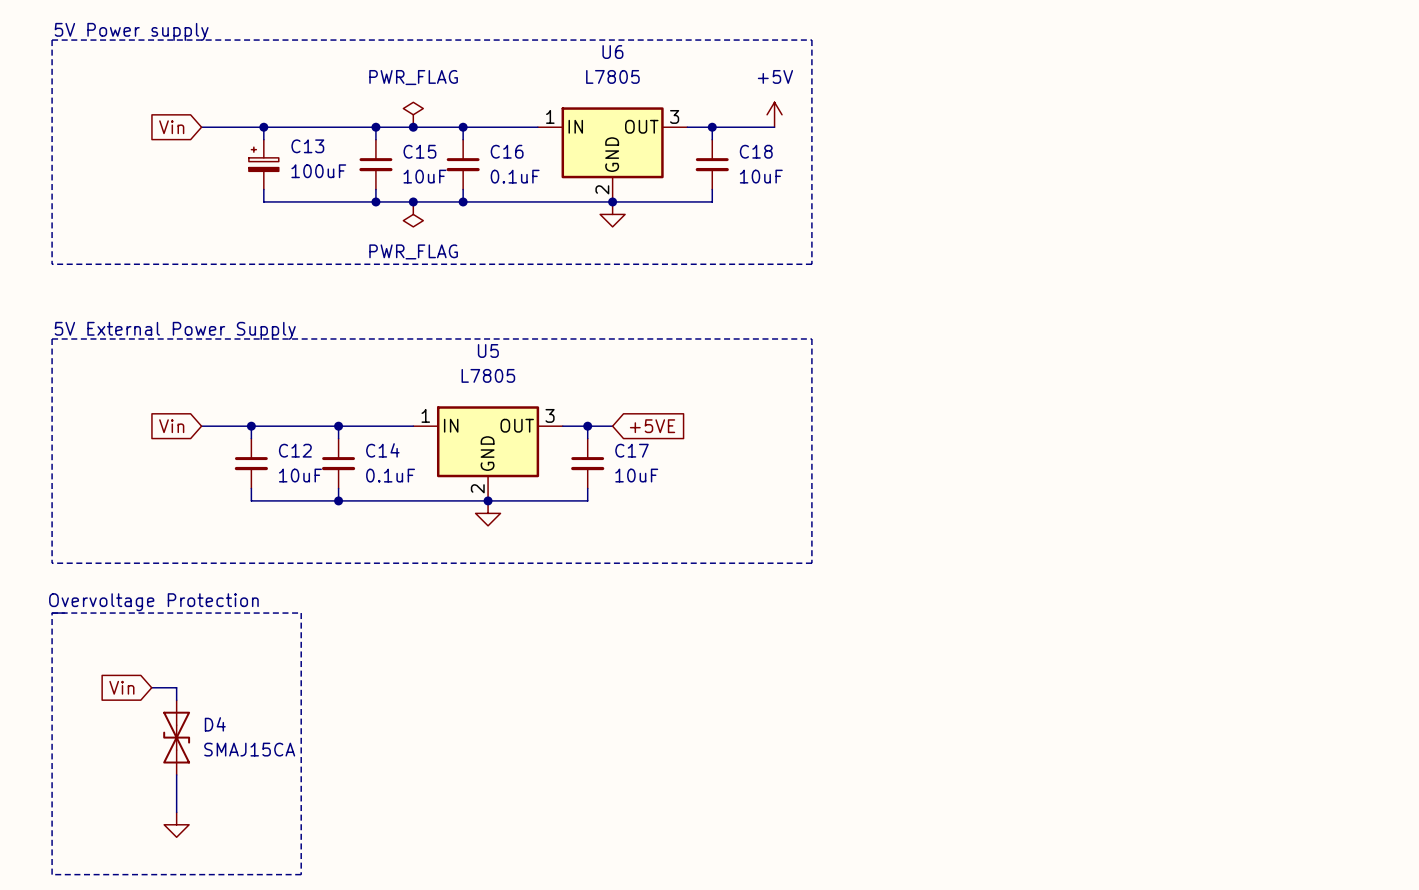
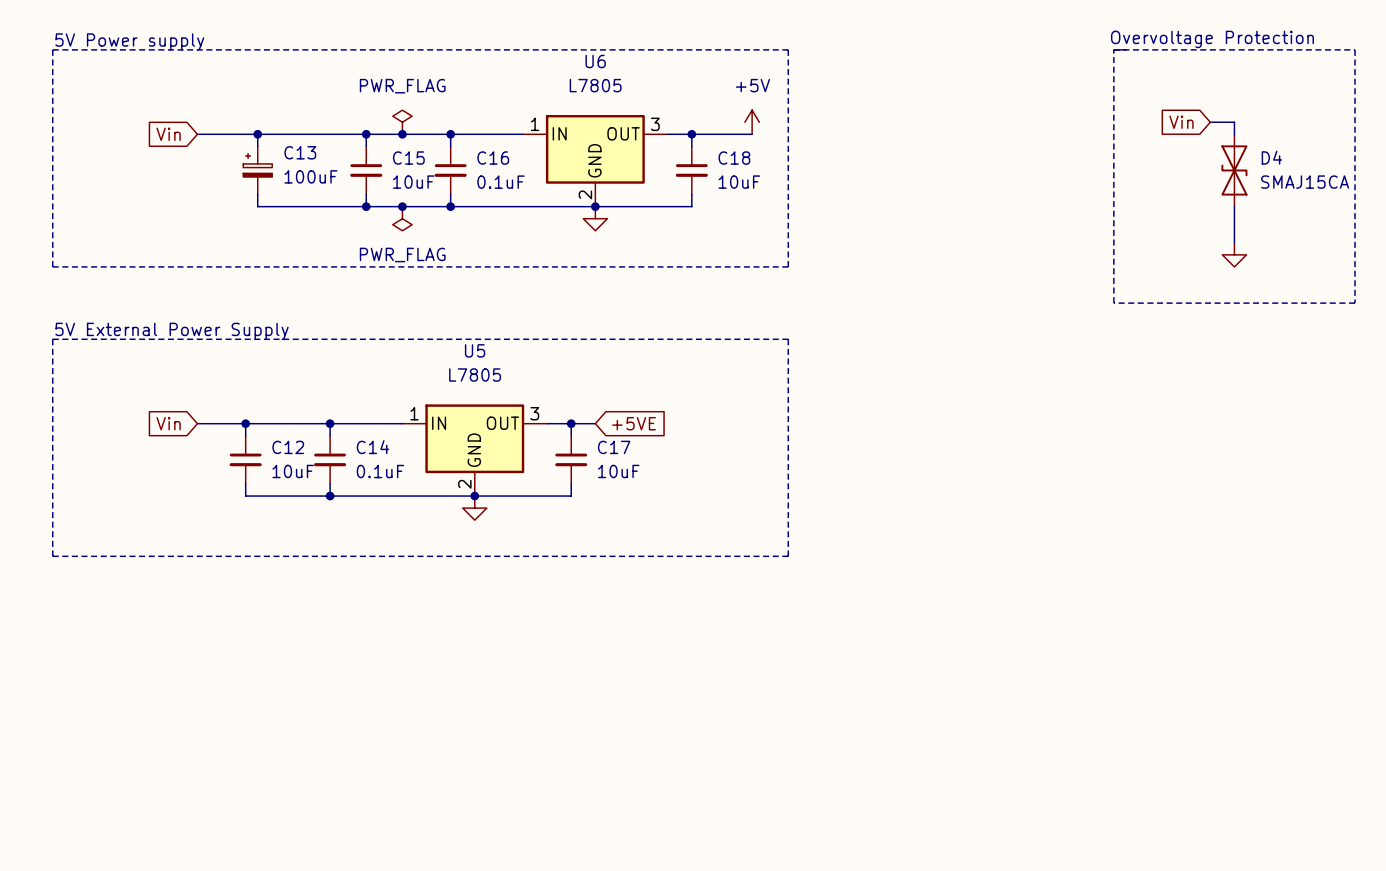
text: none -> Overvoltage Protection (1212, 39)
line: none -> (1113, 49) (1355, 49) (1355, 303) (1113, 303) (1113, 49)
line: none -> (1113, 49) (1125, 49)
global label: none -> Vin (1181, 122)
wire: none -> (1210, 122) (1234, 122) (1234, 134)
wire: none -> (1234, 206) (1234, 242)
power symbol: none -> (1234, 254)
text: Overvoltage Protection (153, 602) -> none
line: (52, 613) (52, 874) (301, 874) (301, 613) (52, 613) -> none
line: (52, 613) (64, 613) -> none
global label: Vin (121, 687) -> none
wire: (151, 687) (176, 687) (176, 700) -> none
D4 position: (176, 737) -> (1234, 170)
wire: (176, 774) (176, 812) -> none
power symbol: (176, 824) -> none

